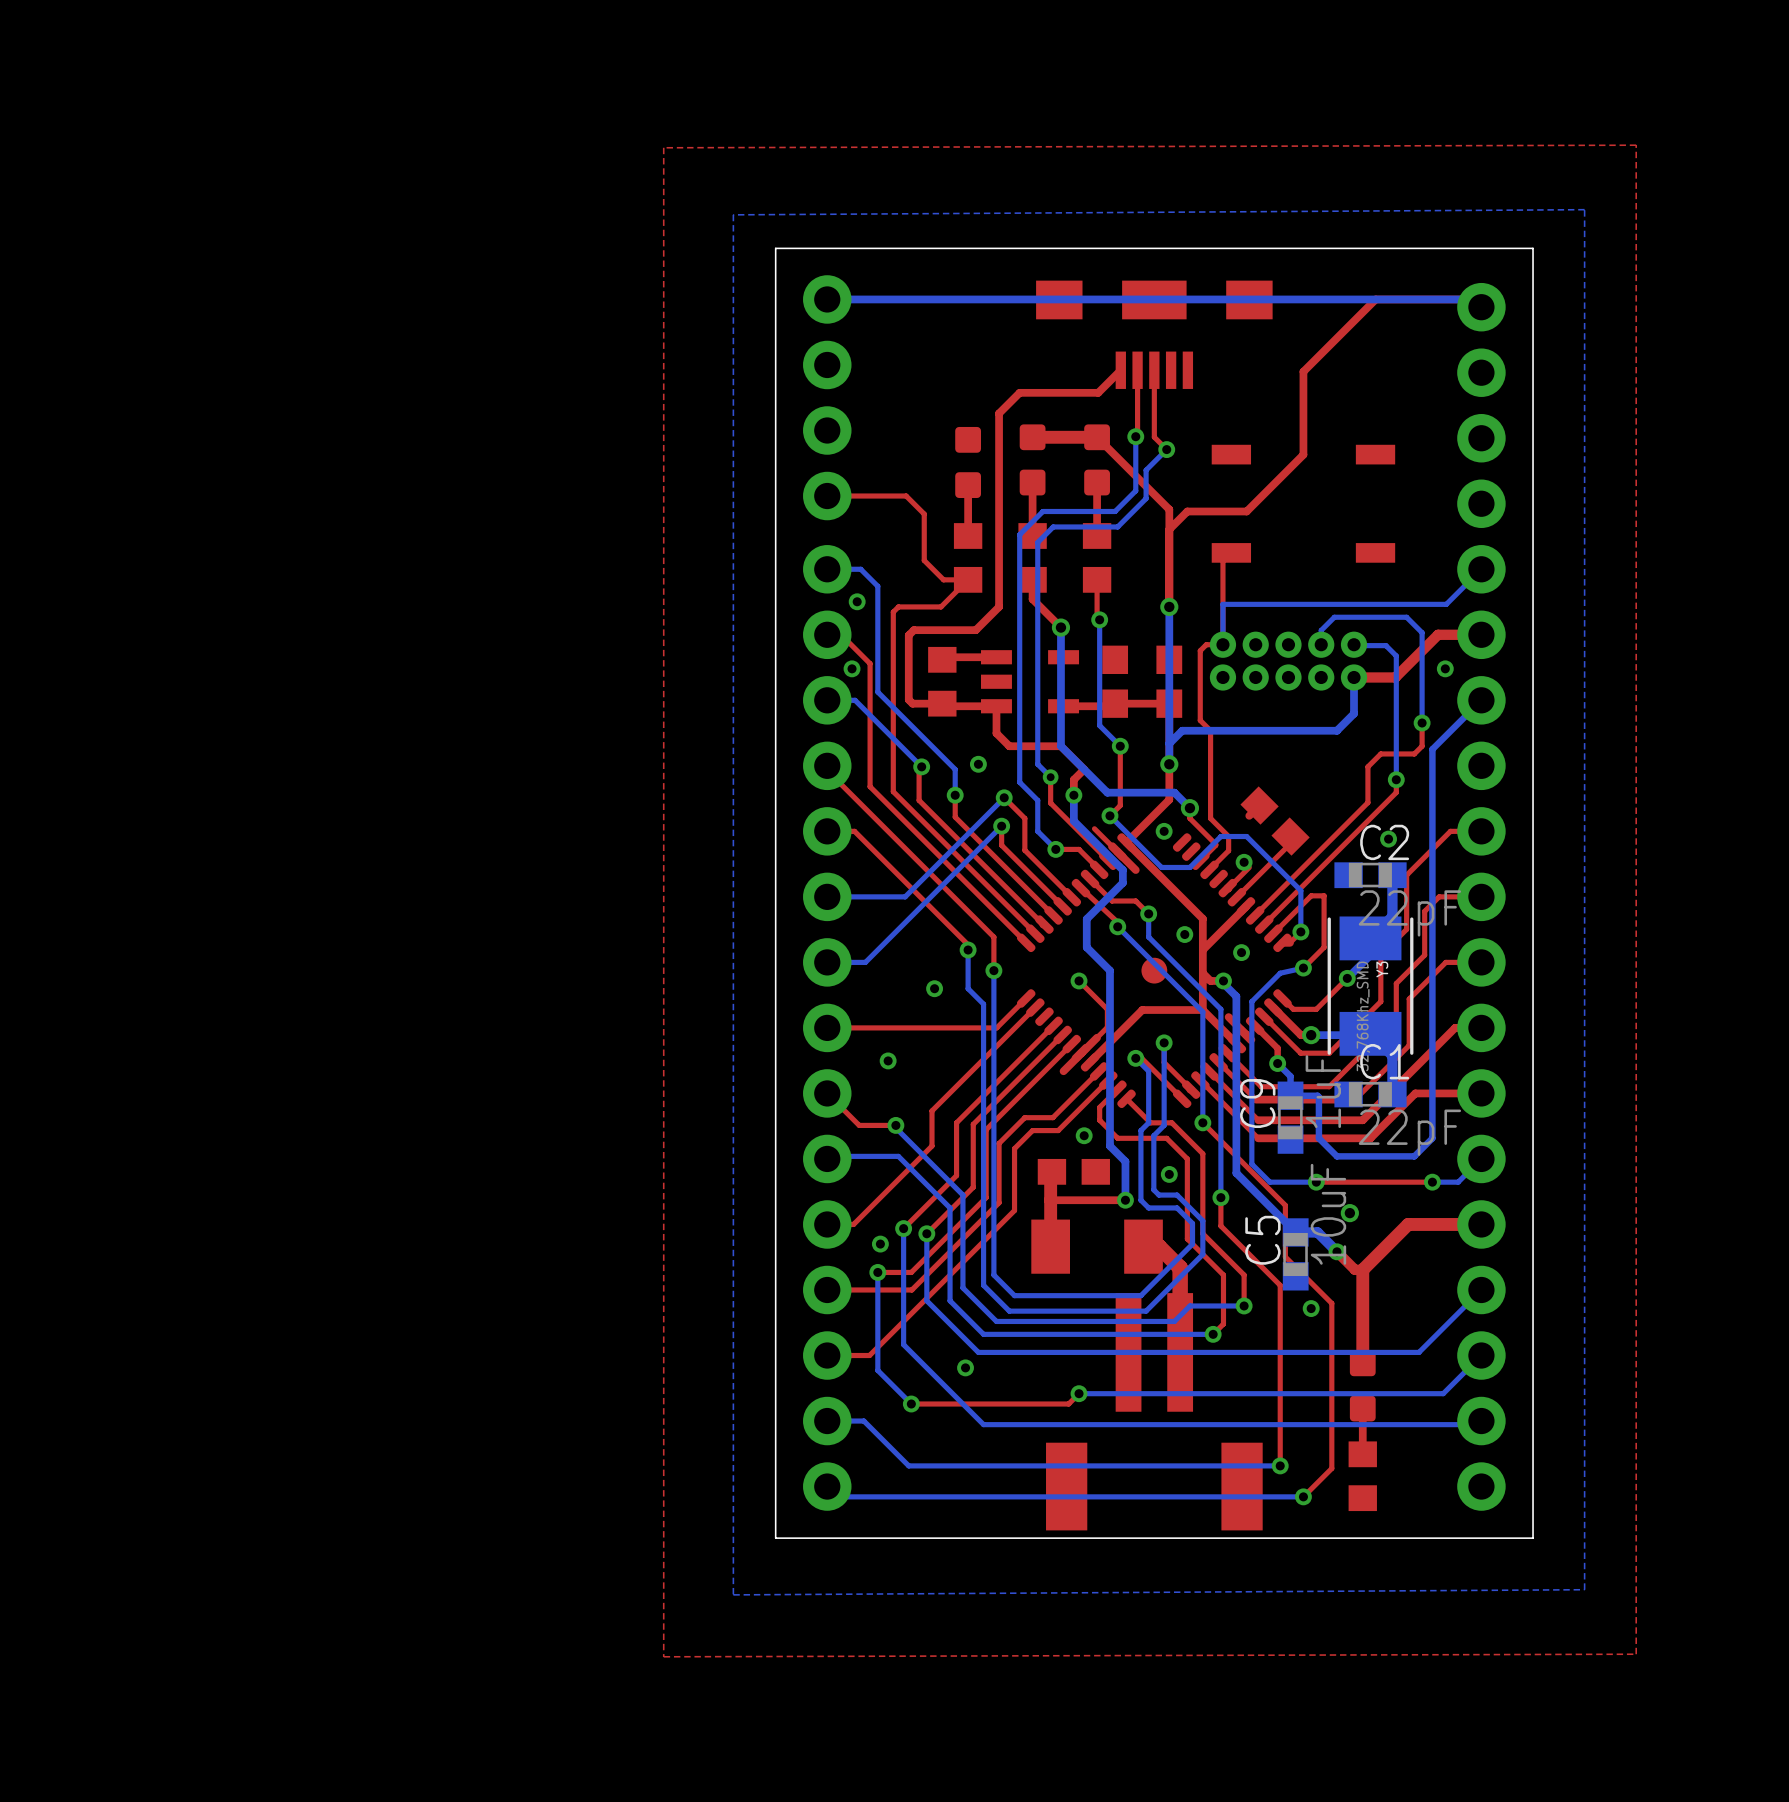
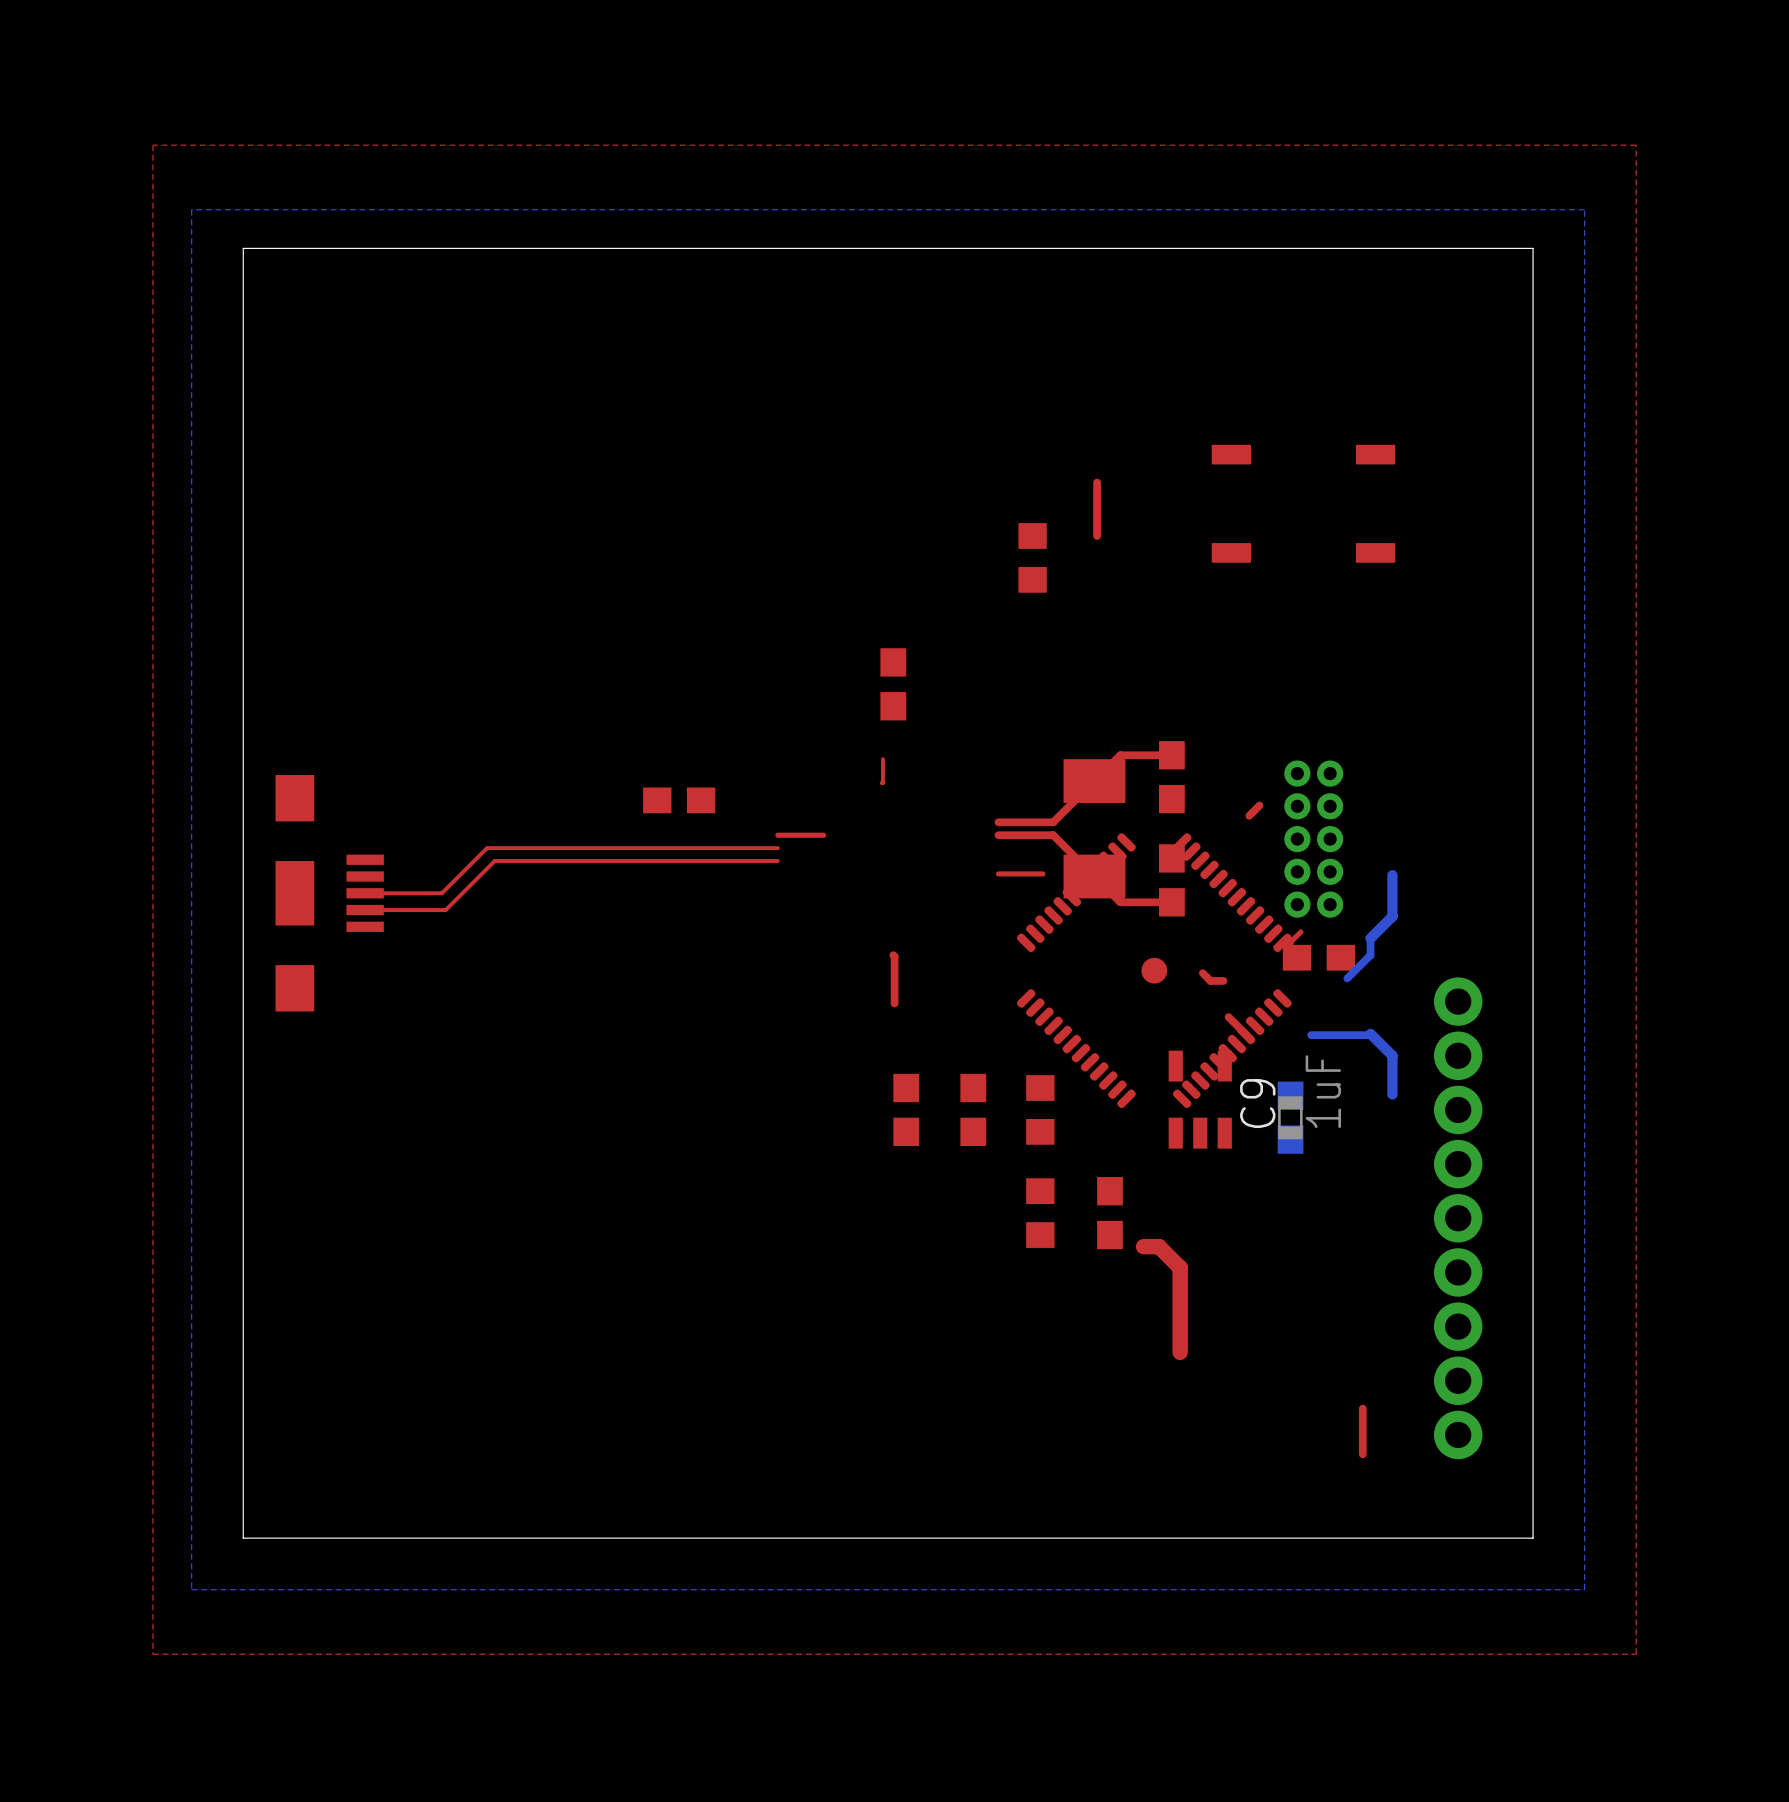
top zone outline: (1636, 145) (663, 147) (663, 1656) (1636, 1654) -> (1636, 145) (152, 145) (152, 1654) (1636, 1654)
bottom zone outline: (1584, 209) (733, 214) (733, 1594) (1584, 1589) -> (1584, 209) (191, 209) (191, 1589) (1584, 1589)
board edge: (775, 248) (775, 1538) -> (775, 248) (243, 248) (243, 1538) (775, 1538)
bottom track: (827, 299) (1473, 299) (1481, 307) -> none
top track: (1481, 307) (1473, 299) (1375, 299) (1303, 371) (1303, 454) (1246, 511) (1187, 511) (1169, 529) -> none
part: (1154, 334) -> none
top track: (1120, 370) (1098, 392) (1019, 392) (999, 413) (999, 606) (975, 630) (913, 630) (908, 635) (908, 699) (912, 703) (942, 703) (944, 706) (996, 706) (996, 733) (1009, 746) (1060, 746) (1084, 769) (1073, 779) (1073, 795) -> none
top track: (1137, 370) (1137, 434) (1135, 436) -> none
top track: (1154, 370) (1154, 437) (1166, 449) -> none
part: (827, 397) -> none
part: (1481, 405) -> none
bottom track: (1135, 436) (1135, 490) (1115, 511) (1042, 511) (1019, 534) (1019, 782) (1037, 800) (1037, 831) (1055, 849) -> none
via: (1135, 436) -> none
top track: (1032, 437) (1097, 437) (1169, 509) (1169, 606) -> none
bottom track: (1166, 449) (1146, 470) (1146, 498) (1117, 526) (1053, 526) (1037, 542) (1037, 764) (1050, 777) -> none
via: (1166, 449) -> none
part: (1032, 459) -> none
part: (1097, 459) -> none
part: (968, 462) -> none
top track: (1032, 482) (1032, 536) -> none
top track: (968, 485) (968, 536) -> none
top track: (827, 496) (906, 496) (924, 514) (924, 560) (943, 579) (968, 579) (941, 606) (898, 606) (893, 612) (893, 791) (1035, 933) -> none
top track: (1231, 552) (1222, 561) (1222, 644) (1206, 644) (1200, 650) (1200, 720) (1210, 730) (1210, 818) (1228, 836) (1228, 850) (1209, 869) -> none
part: (968, 557) -> none
part: (1097, 557) -> none
bottom track: (827, 569) (860, 569) (877, 586) (877, 692) (955, 769) (955, 795) -> none
bottom track: (1481, 569) (1446, 604) (1222, 604) (1222, 644) -> none
top track: (1032, 579) (1032, 599) (1060, 627) -> none
top track: (1097, 579) (1097, 617) (1099, 619) -> none
via: (857, 601) -> none
bottom track: (1169, 606) (1169, 764) -> none
via: (1169, 606) -> none
bottom track: (1099, 619) (1099, 725) (1120, 746) -> none
via: (1099, 619) -> none
bottom track: (1060, 627) (1060, 746) (1107, 792) (1174, 792) (1189, 808) -> none
via: (1060, 627) -> none
top track: (827, 634) (841, 634) (870, 663) (870, 786) (1026, 942) -> none
top track: (1481, 634) (1438, 634) (1395, 677) (1354, 677) -> none
bottom track: (1321, 644) (1321, 630) (1334, 617) (1406, 617) (1422, 632) (1422, 723) -> none
bottom track: (1354, 644) (1385, 645) (1396, 655) (1396, 779) -> none
top track: (996, 657) (942, 657) (942, 659) -> none
part rotation: 0° (1288, 661) -> 90° clockwise (1313, 839)
part position: (1288, 661) -> (1313, 839)
via: (852, 668) -> none
via: (1445, 668) -> none
bottom track: (1354, 677) (1354, 713) (1336, 730) (1182, 730) (1169, 743) -> none
part: (942, 681) -> none
part rotation: 0° (1030, 681) -> 90° counterclockwise (1200, 1099)
part position: (1030, 681) -> (1200, 1099)
part: (1115, 681) -> none
part: (1169, 681) -> none
part: none -> (893, 684)
bottom track: (827, 700) (855, 700) (921, 766) -> none
bottom track: (1481, 700) (1432, 749) (1432, 1138) (1414, 1156) (1336, 1156) (1318, 1138) (1318, 1097) (1290, 1095) (1290, 1076) (1277, 1063) -> none
top track: (1063, 706) (1169, 703) (1169, 799) (1126, 842) (1202, 918) (1202, 1010) -> none
top track: (1422, 723) (1422, 746) (1414, 753) (1380, 753) (1367, 766) (1367, 802) (1255, 915) -> none
via: (1422, 723) -> none
top track: (1120, 746) (1120, 805) (1109, 815) -> none
via: (1120, 746) -> none
top track: none -> (1171, 755) (1120, 755) (1053, 822) (998, 822)
top track: none -> (882, 759) (881, 782)
via: (978, 764) -> none
via: (1169, 764) -> none
top track: (827, 765) (827, 770) (993, 937) (993, 970) -> none
top track: (921, 766) (919, 769) (919, 800) (1044, 924) -> none
via: (921, 766) -> none
top track: (1050, 777) (1050, 803) (1108, 860) -> none
via: (1050, 777) -> none
top track: (1396, 779) (1396, 792) (1264, 924) -> none
via: (1396, 779) -> none
top track: (955, 795) (955, 817) (1053, 915) -> none
via: (955, 795) -> none
bottom track: (1073, 795) (1073, 821) (1122, 870) (1122, 882) (1086, 919) (1086, 947) (1109, 970) (1109, 1146) (1125, 1161) (1125, 1200) -> none
via: (1073, 795) -> none
bottom track: (1004, 797) (905, 896) (827, 896) -> none
top track: (1004, 797) (1024, 818) (1024, 850) (1071, 897) -> none
via: (1004, 797) -> none
part: none -> (679, 800)
top track: (1189, 808) (1189, 818) (1215, 844) (1200, 860) -> none
via: (1189, 808) -> none
bottom track: (1109, 815) (1161, 867) (1189, 867) (1220, 836) (1246, 836) (1300, 890) (1300, 931) -> none
via: (1109, 815) -> none
part: (1275, 821) -> none
bottom track: (1001, 826) (865, 962) (827, 962) -> none
top track: (1001, 826) (1001, 845) (1062, 906) -> none
via: (1001, 826) -> none
top track: (1094, 828) (1135, 870) -> none
top track: (827, 831) (854, 831) (968, 944) (968, 950) -> none
via: (1164, 831) -> none
top track: (1481, 831) (1450, 831) (1406, 875) (1406, 929) (1380, 955) (1380, 1001) (1329, 1053) (1300, 1053) (1264, 1016) -> none
top track: none -> (823, 835) (777, 835)
top track: none -> (998, 835) (1053, 835) (1120, 902) (1171, 902)
top track: (1290, 836) (1290, 843) (1236, 897) -> none
via: (1388, 839) -> none
top track: none -> (777, 848) (487, 848) (441, 893) (365, 893)
top track: (1055, 849) (1079, 849) (1099, 869) -> none
via: (1055, 849) -> none
top track: none -> (777, 861) (494, 861) (445, 910) (365, 910)
via: (1244, 862) -> none
top track: (1249, 867) (1227, 888) -> none
top track: none -> (1042, 873) (998, 873)
C2 side: bottom (1370, 875) -> top (1171, 777)
top track: (1090, 878) (1112, 901) (1135, 901) (1148, 913) -> none
top track: (1080, 888) (1117, 922) (1117, 926) -> none
part: none -> (329, 893)
top track: (1481, 896) (1439, 896) (1424, 911) (1424, 955) (1396, 983) (1396, 1019) (1329, 1086) (1261, 1086) (1227, 1053) -> none
top track: (1246, 906) (1202, 950) -> none
bottom track: (1148, 913) (1148, 937) (1220, 1009) (1220, 1197) -> none
via: (1148, 913) -> none
bottom track: (1117, 926) (1202, 1011) (1202, 1122) -> none
via: (1117, 926) -> none
via: (1300, 931) -> none
top track: (1273, 933) (1311, 895) (1324, 895) (1324, 947) (1303, 968) -> none
via: (1184, 934) -> none
bottom track: (968, 950) (968, 988) (983, 1004) (983, 1285) (1009, 1311) (1146, 1311) (1202, 1254) (1202, 1220) (1177, 1195) (1158, 1195) (1153, 1189) (1153, 1135) (1164, 1125) (1164, 1042) (1161, 1045) -> none
via: (968, 950) -> none
via: (1241, 952) -> none
top track: none -> (893, 955) (894, 1003)
part: none -> (1318, 957)
top track: (1481, 962) (1445, 962) (1409, 999) (1409, 1045) (1355, 1099) (1255, 1099) (1218, 1062) -> none
bottom track: (1303, 968) (1280, 973) (1251, 1001) (1251, 1164) (1269, 1182) (1316, 1182) -> none
via: (1303, 968) -> none
bottom track: (993, 970) (993, 1275) (1014, 1295) (1140, 1295) (1192, 1244) (1192, 1223) (1177, 1207) (1148, 1207) (1140, 1200) (1140, 1130) (1148, 1122) (1148, 1071) (1135, 1058) -> none
via: (993, 970) -> none
top track: (1347, 978) (1316, 1009) (1293, 1009) (1282, 998) -> none
via: (1347, 978) -> none
top track: (1079, 980) (1107, 1009) (1107, 1027) (1063, 1071) (1097, 1037) -> none
via: (1079, 980) -> none
via: (1223, 980) -> none
bottom track: (1224, 982) (1223, 980) (1223, 983) (1236, 996) (1236, 1173) (1295, 1232) (1317, 1232) (1336, 1251) -> none
Y3 side: bottom (1370, 986) -> top (1094, 828)
via: (934, 988) -> none
top track: (1026, 998) (996, 1027) (827, 1027) -> none
part: none -> (1458, 1001)
top track: (1035, 1007) (931, 1110) (931, 1146) (853, 1224) (827, 1224) -> none
top track: (1273, 1007) (1300, 1035) (1311, 1035) -> none
top track: (1202, 1010) (1236, 1044) -> none
top track: (1202, 1010) (1142, 1010) (1090, 1062) -> none
top track: (1053, 1025) (956, 1122) (956, 1175) (903, 1228) -> none
top track: (1255, 1025) (1277, 1048) (1277, 1063) -> none
part: (827, 1027) -> none
top track: (1481, 1027) (1455, 1027) (1362, 1120) (1258, 1120) (1209, 1071) -> none
part: (1481, 1027) -> none
top track: (1062, 1034) (973, 1124) (973, 1187) (926, 1233) -> none
via: (1311, 1035) -> none
top track: (1164, 1042) (1164, 1062) (1190, 1089) -> none
via: (1164, 1042) -> none
top track: (1071, 1044) (986, 1129) (986, 1197) (911, 1272) (877, 1272) -> none
part: none -> (1458, 1055)
top track: (1135, 1058) (1141, 1058) (1182, 1098) -> none
via: (1135, 1058) -> none
via: (888, 1060) -> none
via: (1277, 1063) -> none
top track: (1099, 1071) (1052, 1117) (1024, 1117) (999, 1143) (999, 1202) (911, 1289) (827, 1289) -> none
top track: (1108, 1080) (1058, 1130) (1032, 1130) (1014, 1148) (1014, 1210) (869, 1355) (827, 1355) -> none
top track: (1200, 1080) (1258, 1138) (1370, 1138) (1415, 1093) (1481, 1093) -> none
top track: (1117, 1089) (1099, 1107) (1099, 1120) (1117, 1138) (1166, 1138) (1187, 1158) (1187, 1238) (1223, 1275) (1223, 1324) (1213, 1334) -> none
top track: (827, 1093) (859, 1125) (895, 1125) -> none
C1 side: bottom (1370, 1094) -> top (1171, 880)
top track: (1126, 1098) (1150, 1122) (1171, 1122) (1202, 1153) (1202, 1233) (1244, 1275) (1244, 1305) -> none
part: none -> (906, 1109)
part: none -> (1040, 1109)
part: none -> (1458, 1109)
top track: (1202, 1122) (1285, 1205) (1285, 1256) (1331, 1303) (1331, 1468) (1303, 1496) -> none
via: (1202, 1122) -> none
bottom track: (895, 1125) (895, 1128) (962, 1195) (962, 1287) (996, 1321) (1174, 1321) (1189, 1305) (1244, 1305) -> none
via: (895, 1125) -> none
via: (1084, 1135) -> none
bottom track: (827, 1158) (829, 1156) (898, 1156) (950, 1207) (950, 1300) (983, 1334) (1213, 1334) -> none
bottom track: (1481, 1158) (1458, 1182) (1432, 1182) -> none
part: none -> (1458, 1164)
part rotation: 0° (1073, 1171) -> 90° clockwise (1109, 1213)
part position: (1073, 1171) -> (1109, 1213)
via: (1169, 1174) -> none
via: (1316, 1182) -> none
top track: (1432, 1182) (1316, 1182) -> none
via: (1432, 1182) -> none
top track: (1220, 1197) (1220, 1226) (1280, 1285) (1280, 1465) -> none
via: (1220, 1197) -> none
top track: (1125, 1200) (1051, 1200) (1051, 1171) (1050, 1246) -> none
via: (1125, 1200) -> none
part: none -> (1040, 1213)
via: (1349, 1213) -> none
part: none -> (1458, 1218)
top track: (1481, 1224) (1408, 1224) (1362, 1269) -> none
bottom track: (903, 1228) (903, 1344) (983, 1424) (1477, 1424) (1481, 1421) -> none
via: (903, 1228) -> none
bottom track: (926, 1233) (926, 1300) (978, 1352) (1419, 1352) (1481, 1289) -> none
via: (926, 1233) -> none
via: (880, 1244) -> none
part: (1097, 1246) -> none
top track: (1336, 1251) (1355, 1269) (1362, 1269) -> none
via: (1336, 1251) -> none
C5 side: bottom (1295, 1254) -> top (973, 1109)
top track: (1362, 1269) (1362, 1363) -> none
bottom track: (877, 1272) (877, 1370) (911, 1404) -> none
via: (877, 1272) -> none
part: none -> (1458, 1272)
via: (1244, 1305) -> none
via: (1311, 1308) -> none
part: none -> (1458, 1326)
via: (1213, 1334) -> none
bottom track: (1481, 1355) (1443, 1393) (1079, 1393) -> none
via: (965, 1367) -> none
part: none -> (1458, 1380)
part: (1362, 1385) -> none
top track: (1079, 1393) (1068, 1404) (911, 1404) -> none
via: (1079, 1393) -> none
via: (911, 1404) -> none
part: (1154, 1411) -> none
bottom track: (827, 1421) (863, 1421) (908, 1465) (1280, 1465) -> none
part: none -> (1458, 1434)
via: (1280, 1465) -> none
part: (1362, 1476) -> none
bottom track: (827, 1486) (837, 1496) (1303, 1496) -> none
via: (1303, 1496) -> none

